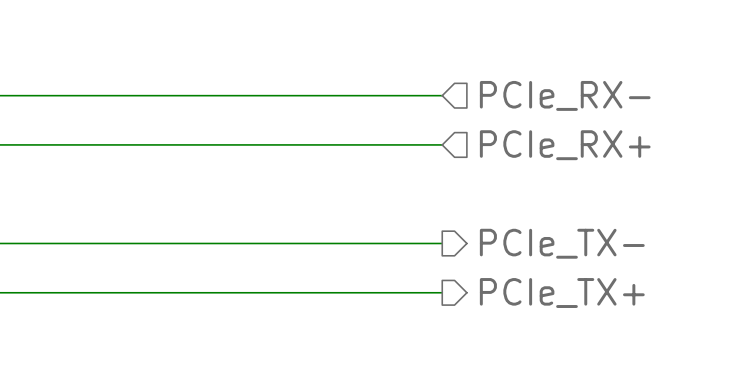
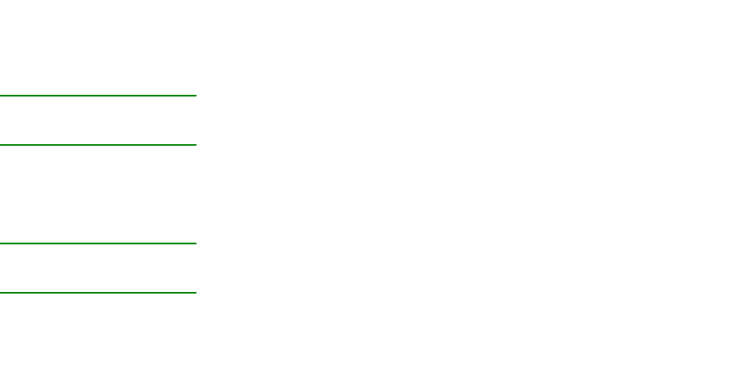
wire: (195, 95) (442, 95) -> none
hierarchical label: PCIe_RX- (565, 95) -> none
wire: (195, 144) (442, 144) -> none
hierarchical label: PCIe_RX+ (565, 145) -> none
wire: (195, 243) (442, 243) -> none
hierarchical label: PCIe_TX- (562, 243) -> none
wire: (195, 292) (442, 292) -> none
hierarchical label: PCIe_TX+ (562, 293) -> none

